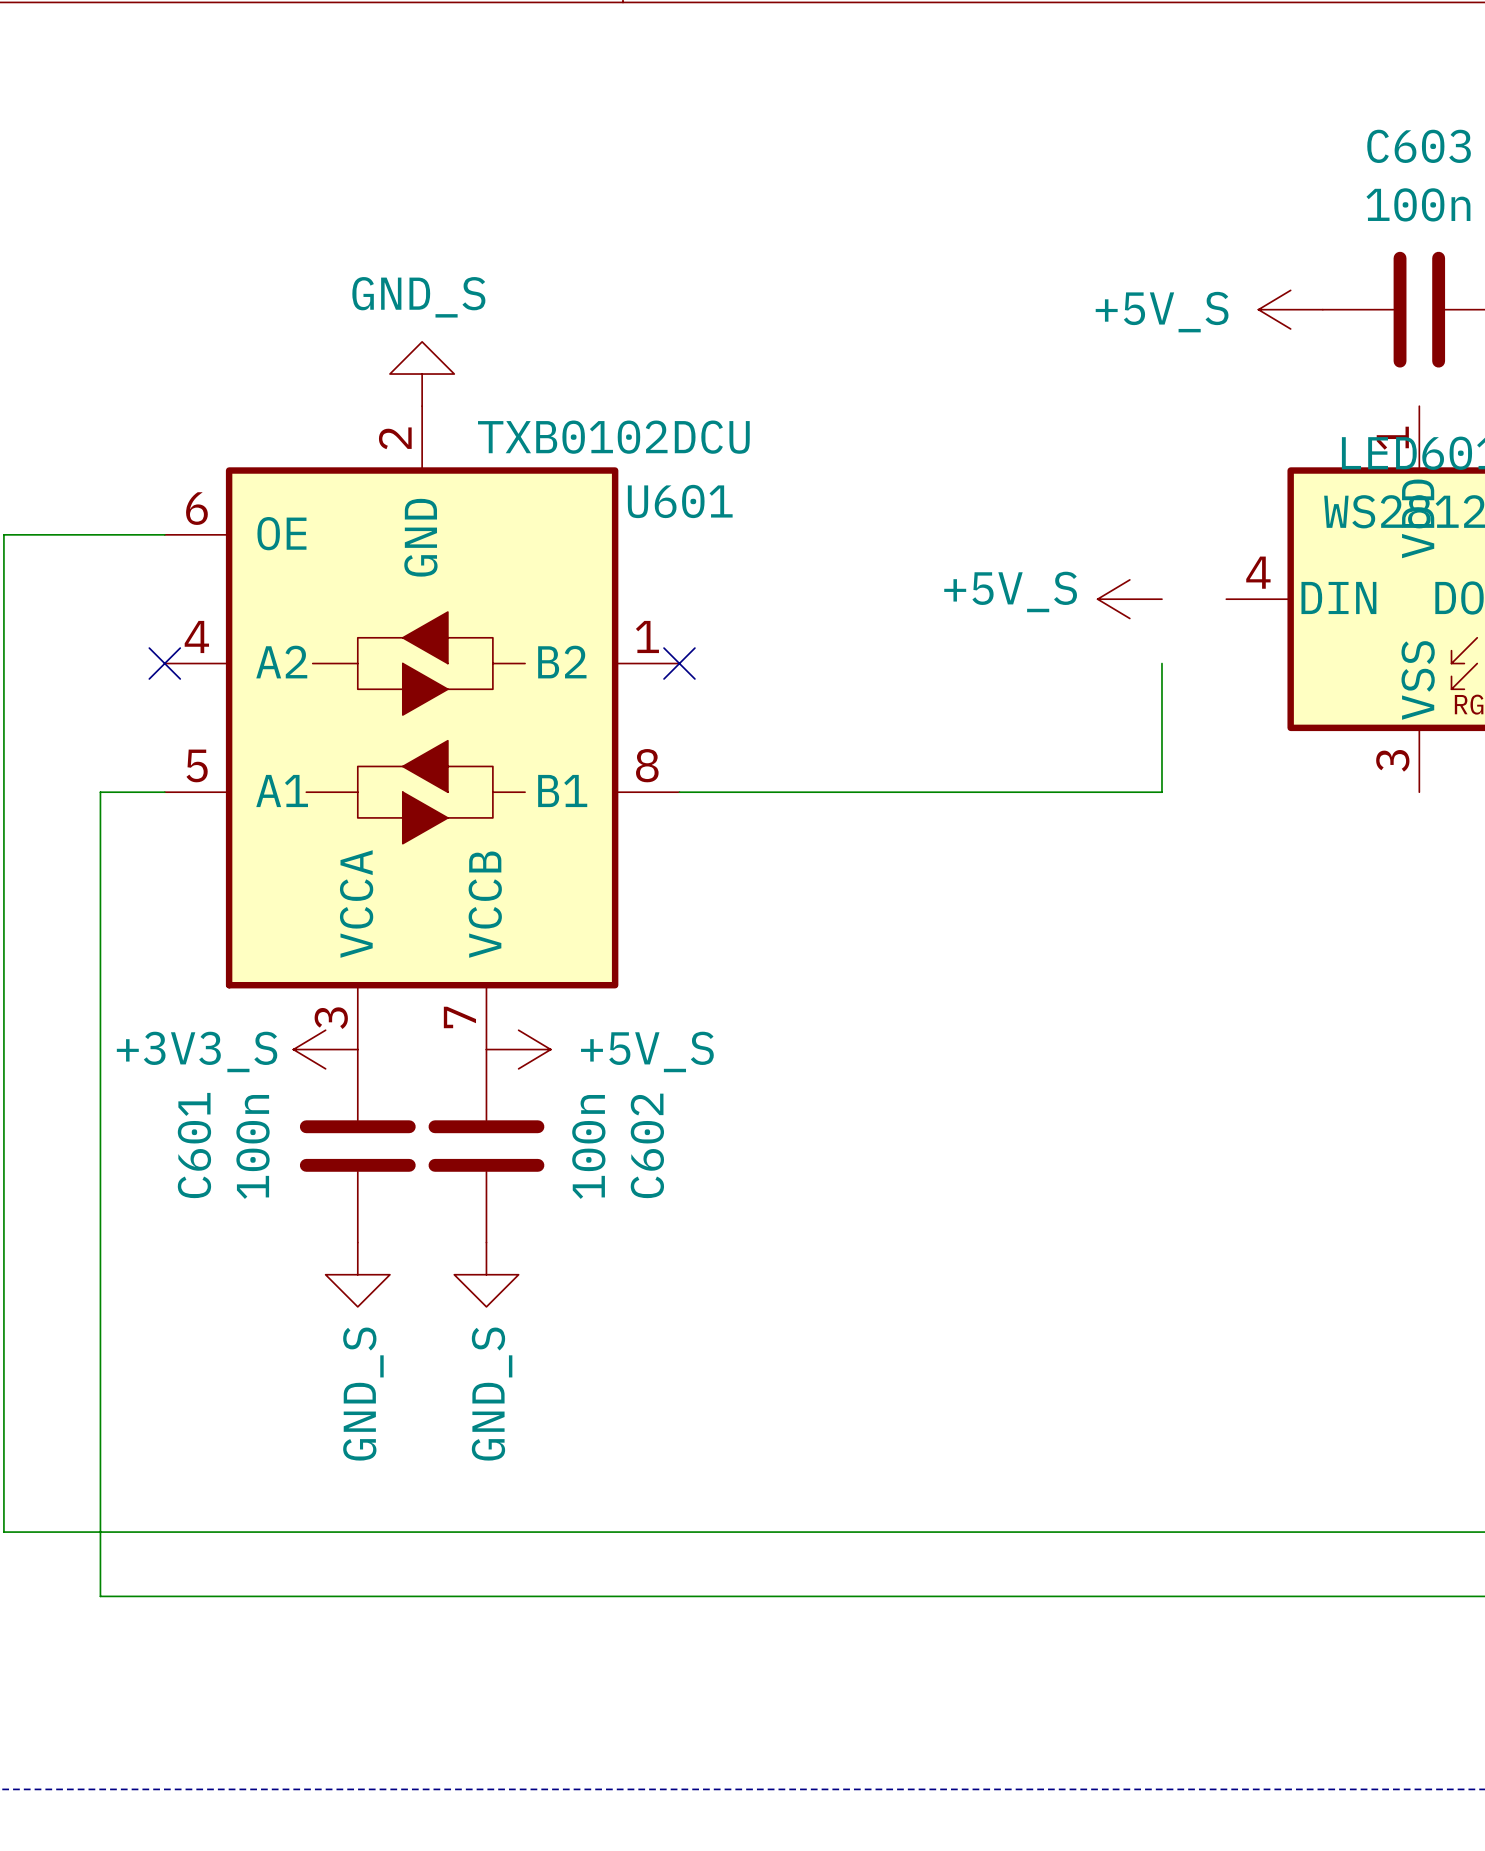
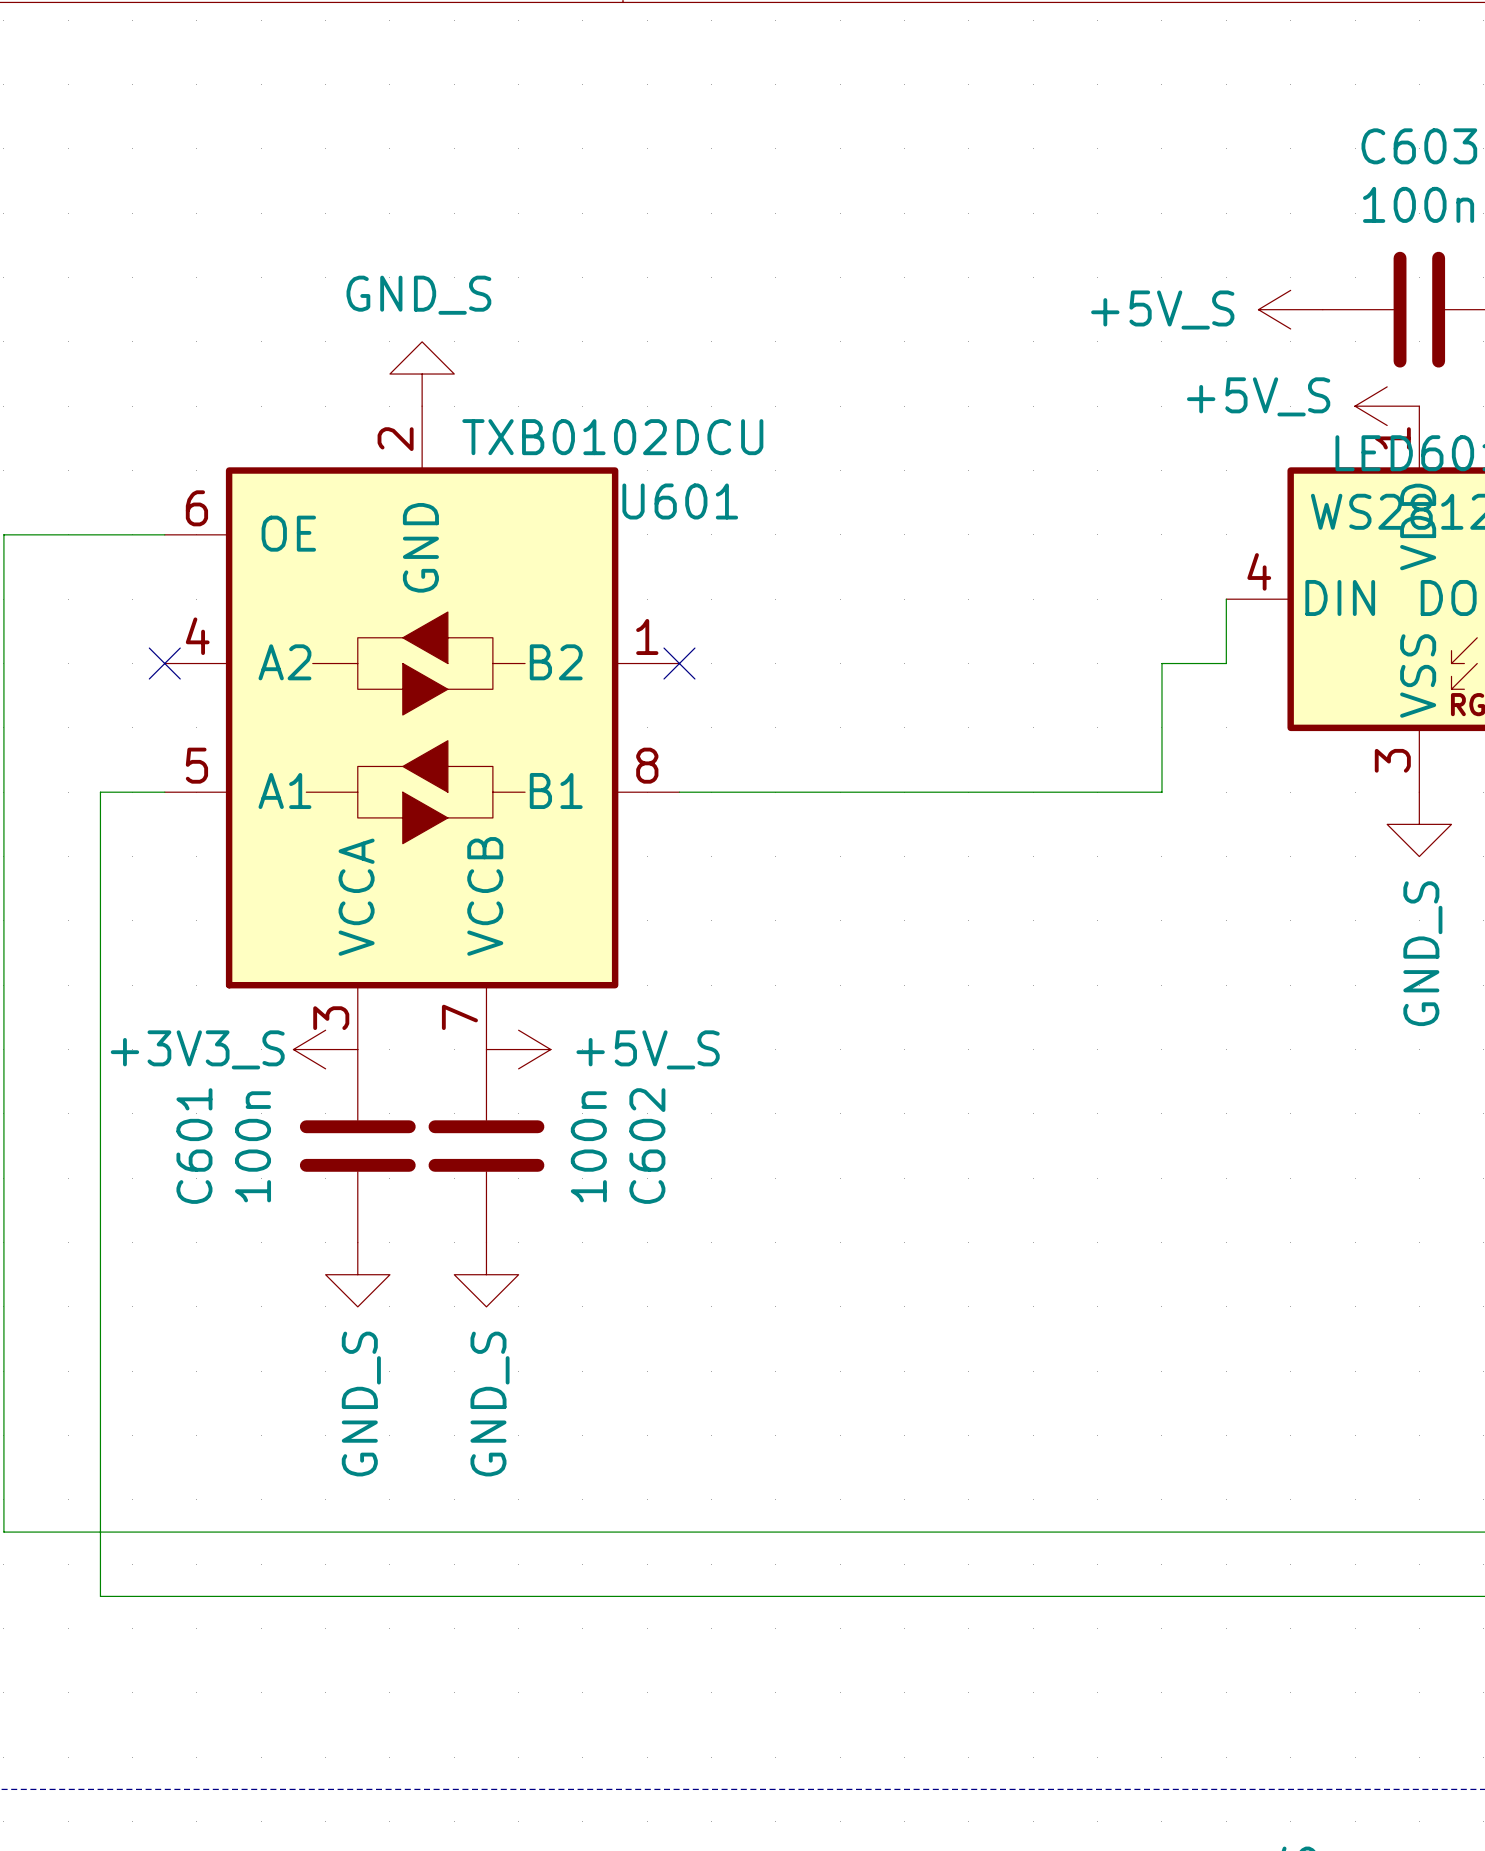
power symbol position: +5V_S (1129, 599) -> +5V_S (1387, 406)
wire: none -> (1226, 599) (1226, 663) (1161, 663)
power symbol: none -> GND_S (1419, 824)

